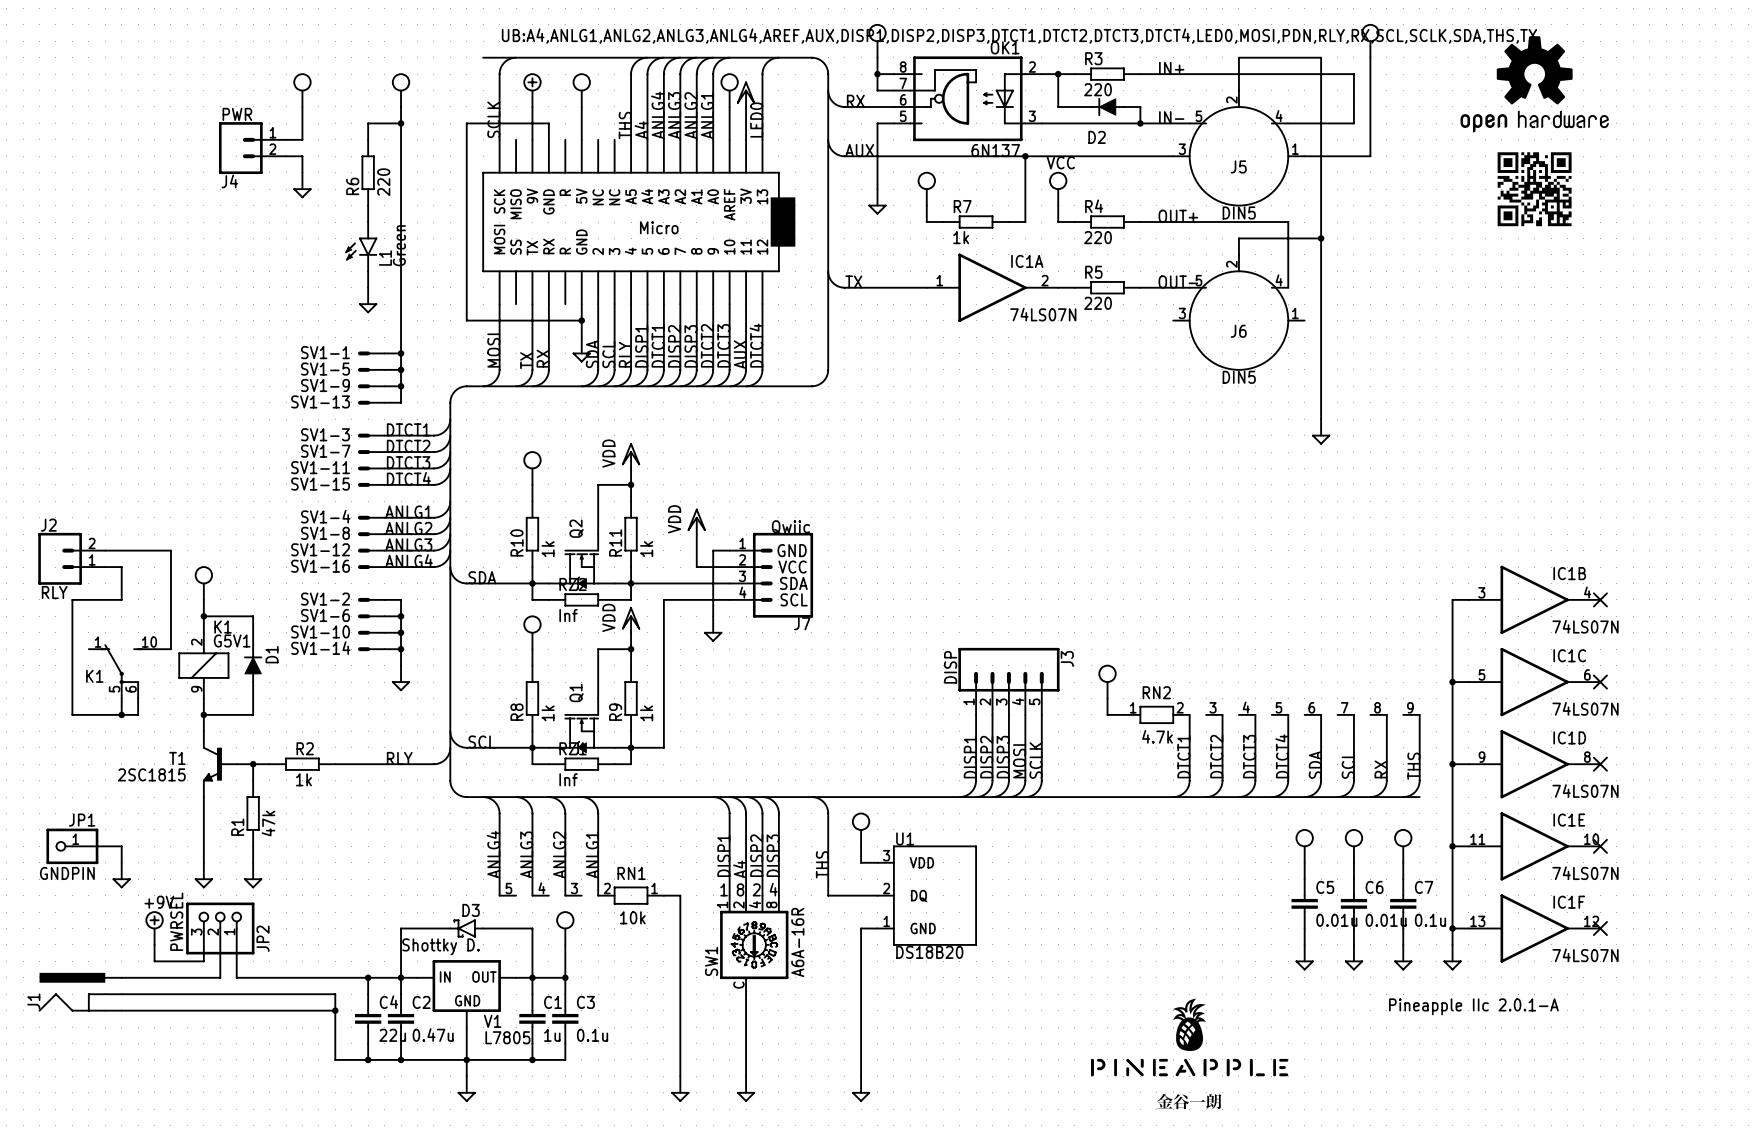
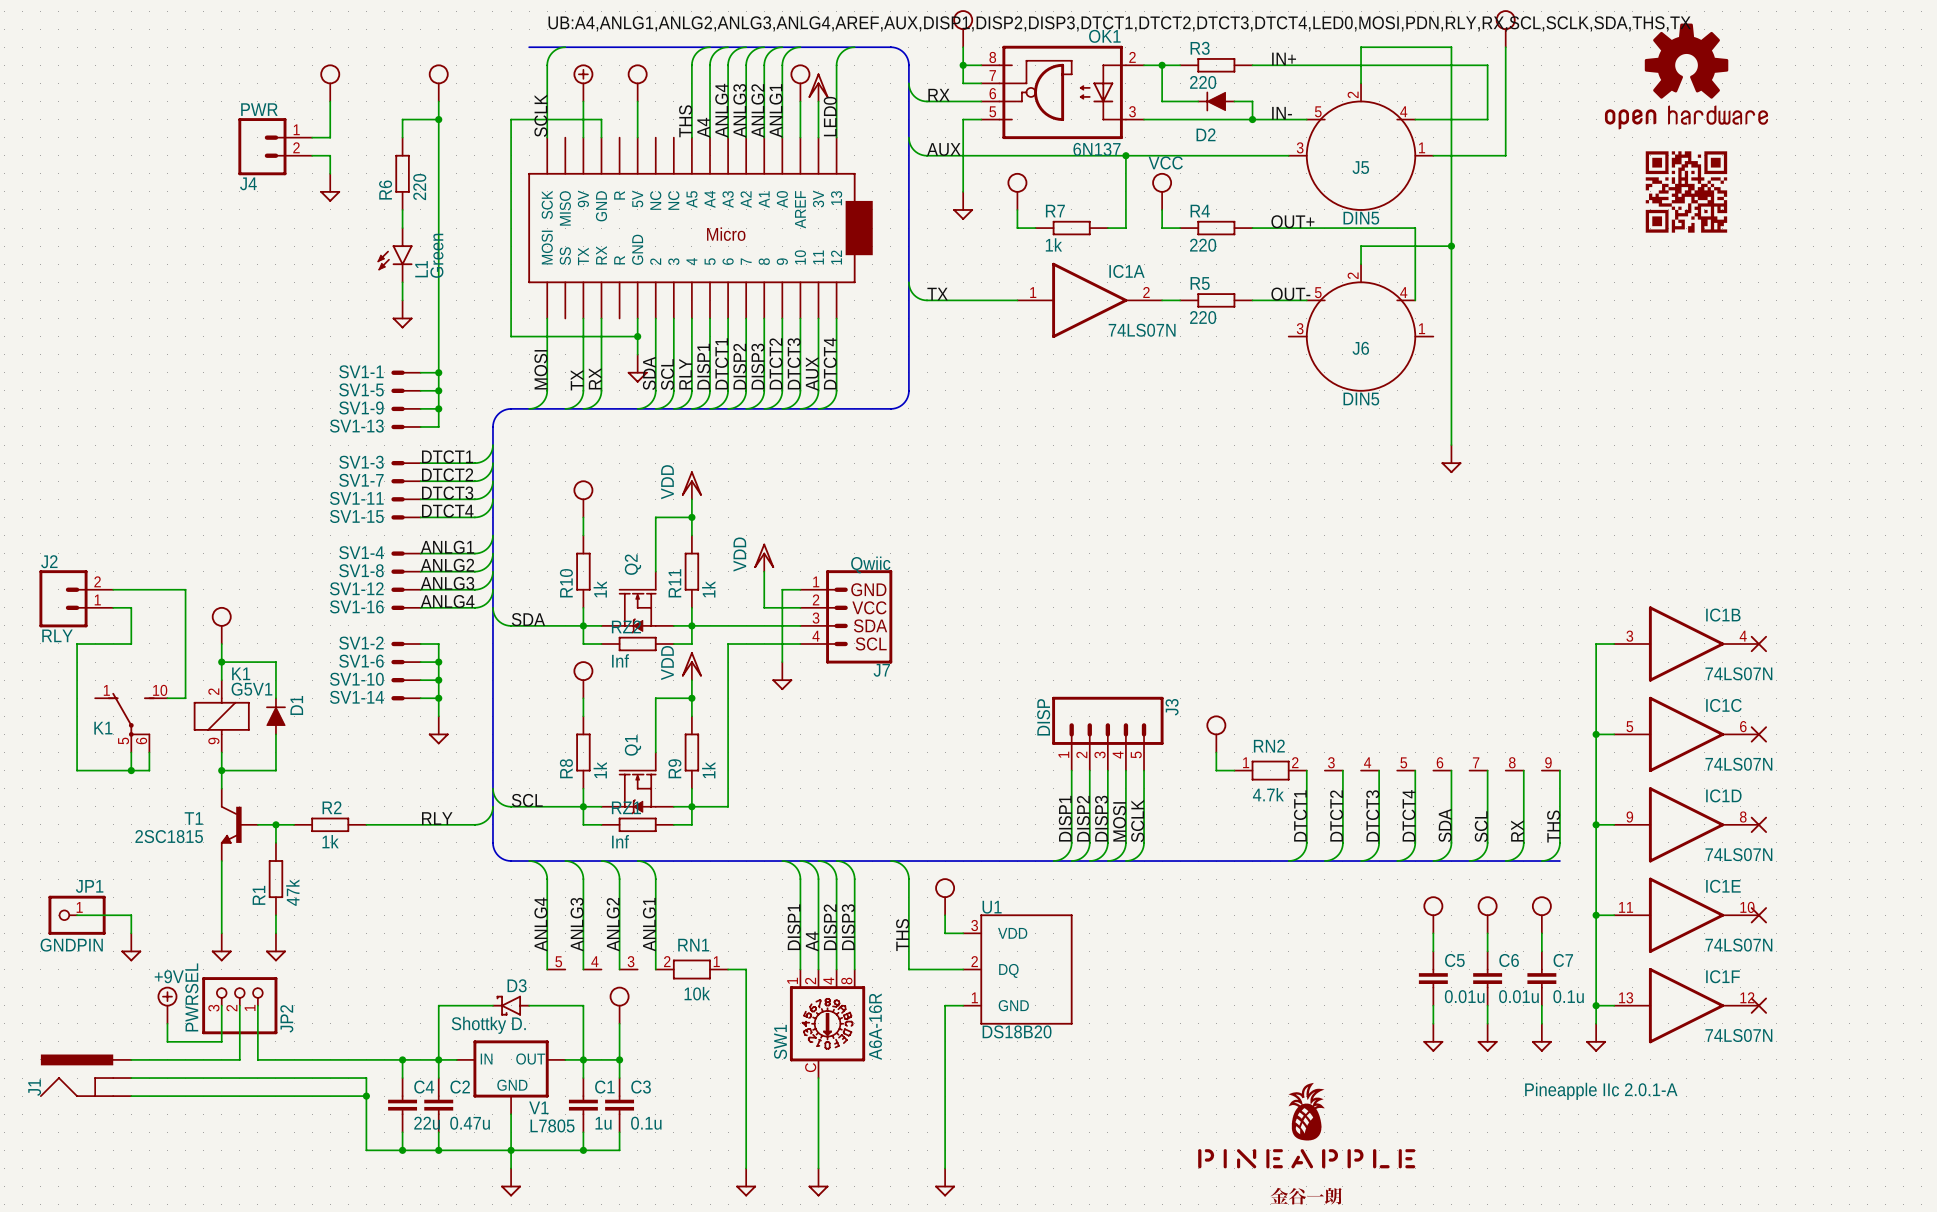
text: 1 (724, 889) -> none
text: 8 (740, 889) -> none
text: 2 (756, 889) -> none
text: 4 (773, 889) -> none

